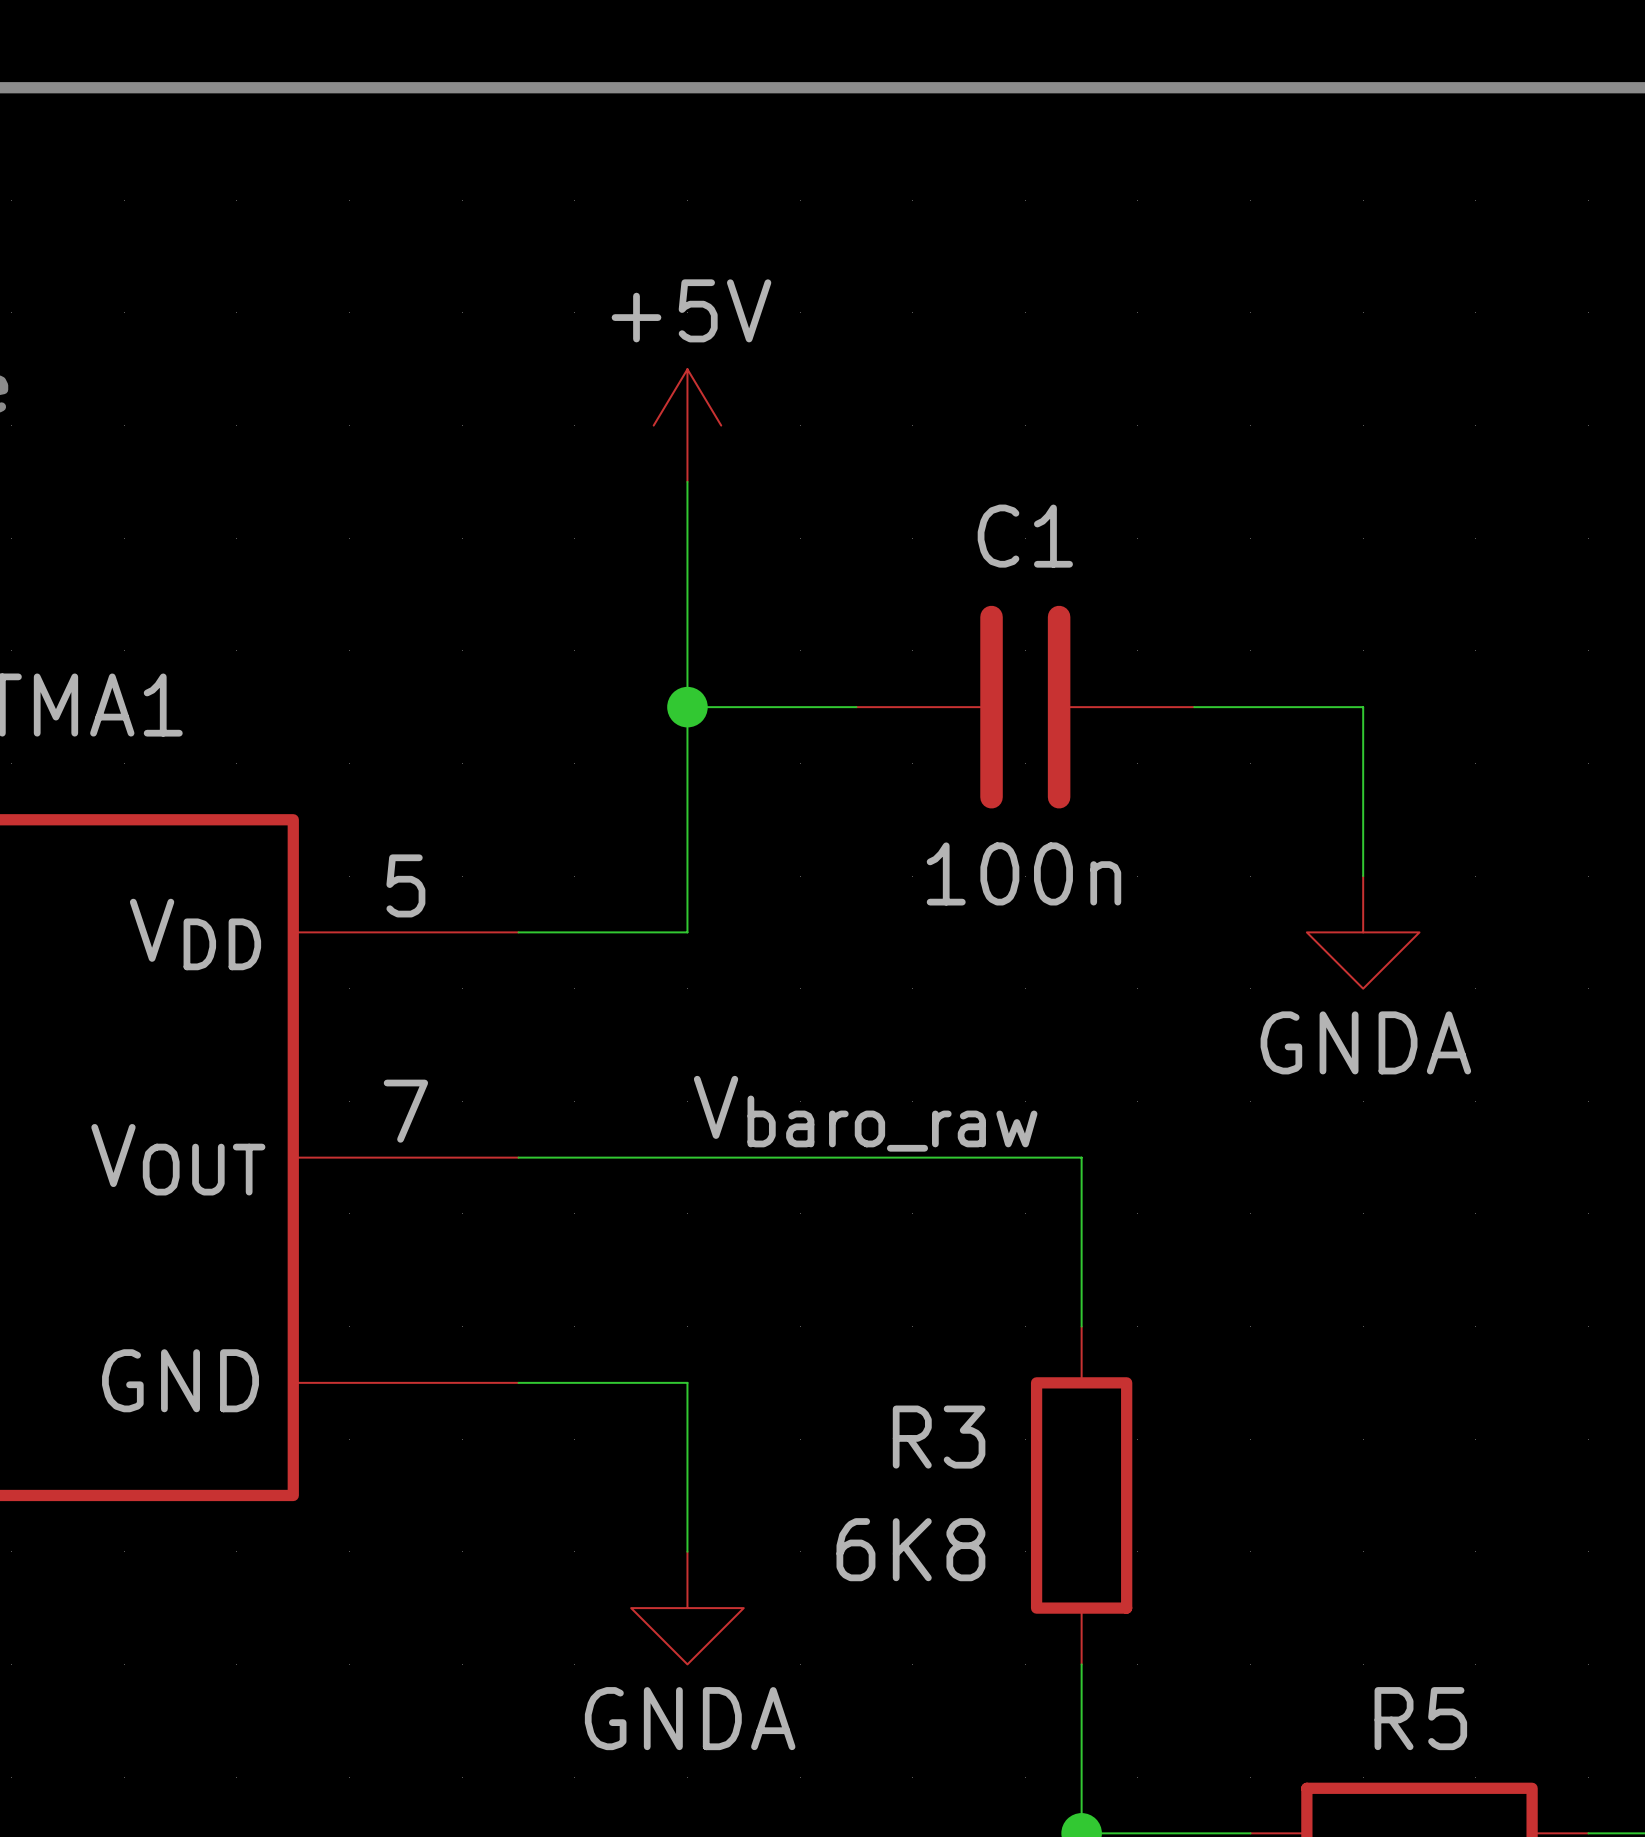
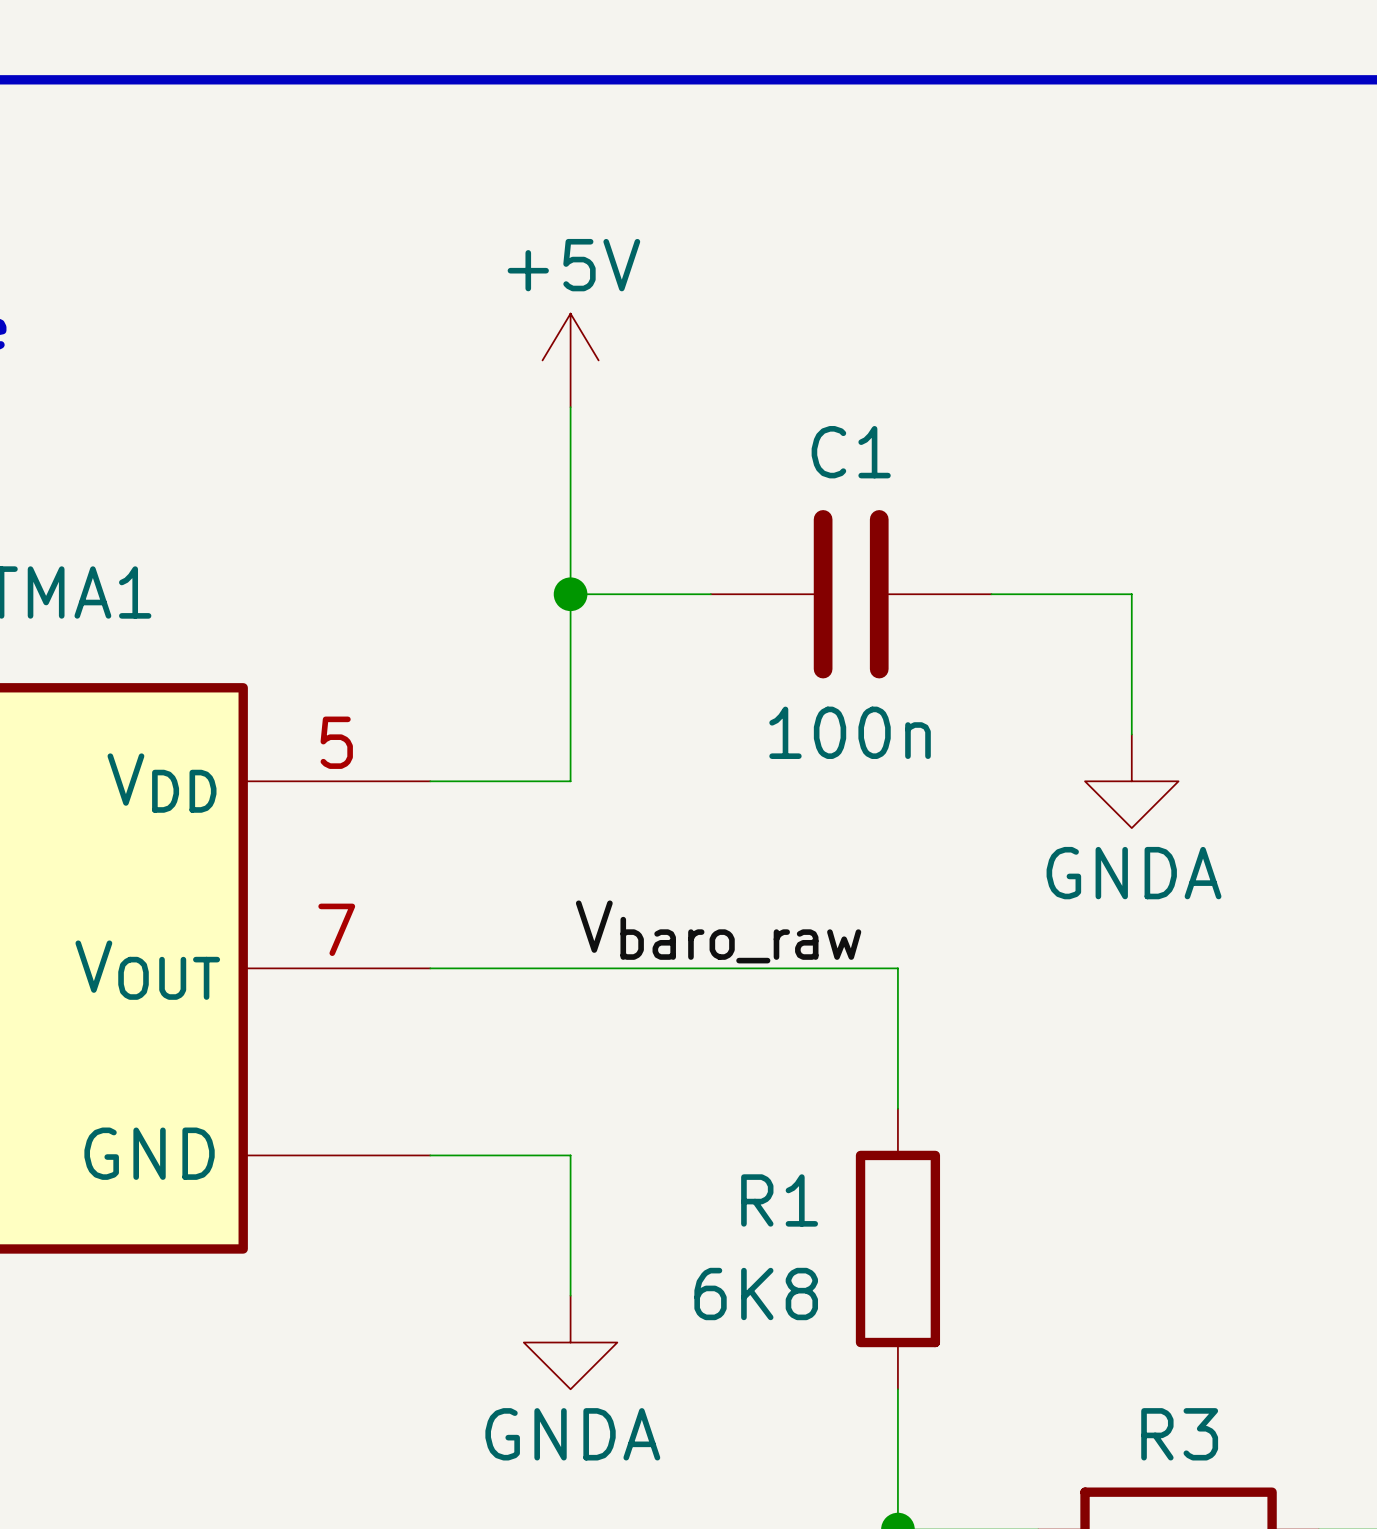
R3 name: R3 (939, 1437) -> R1 (779, 1200)
R5 name: R5 (1420, 1718) -> R3 (1179, 1434)

